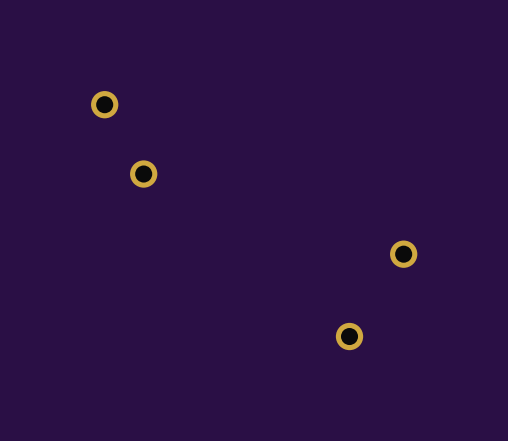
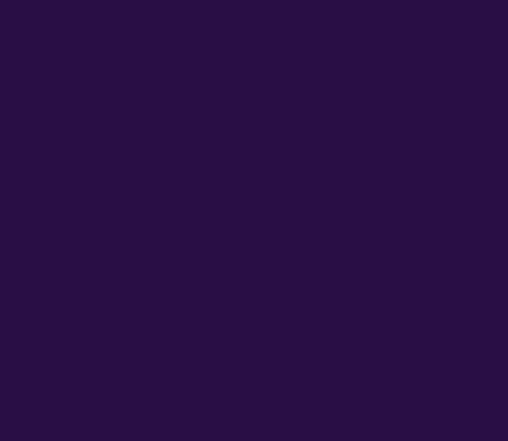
via: (104, 104) -> none
via: (143, 174) -> none
via: (403, 254) -> none
via: (349, 336) -> none

